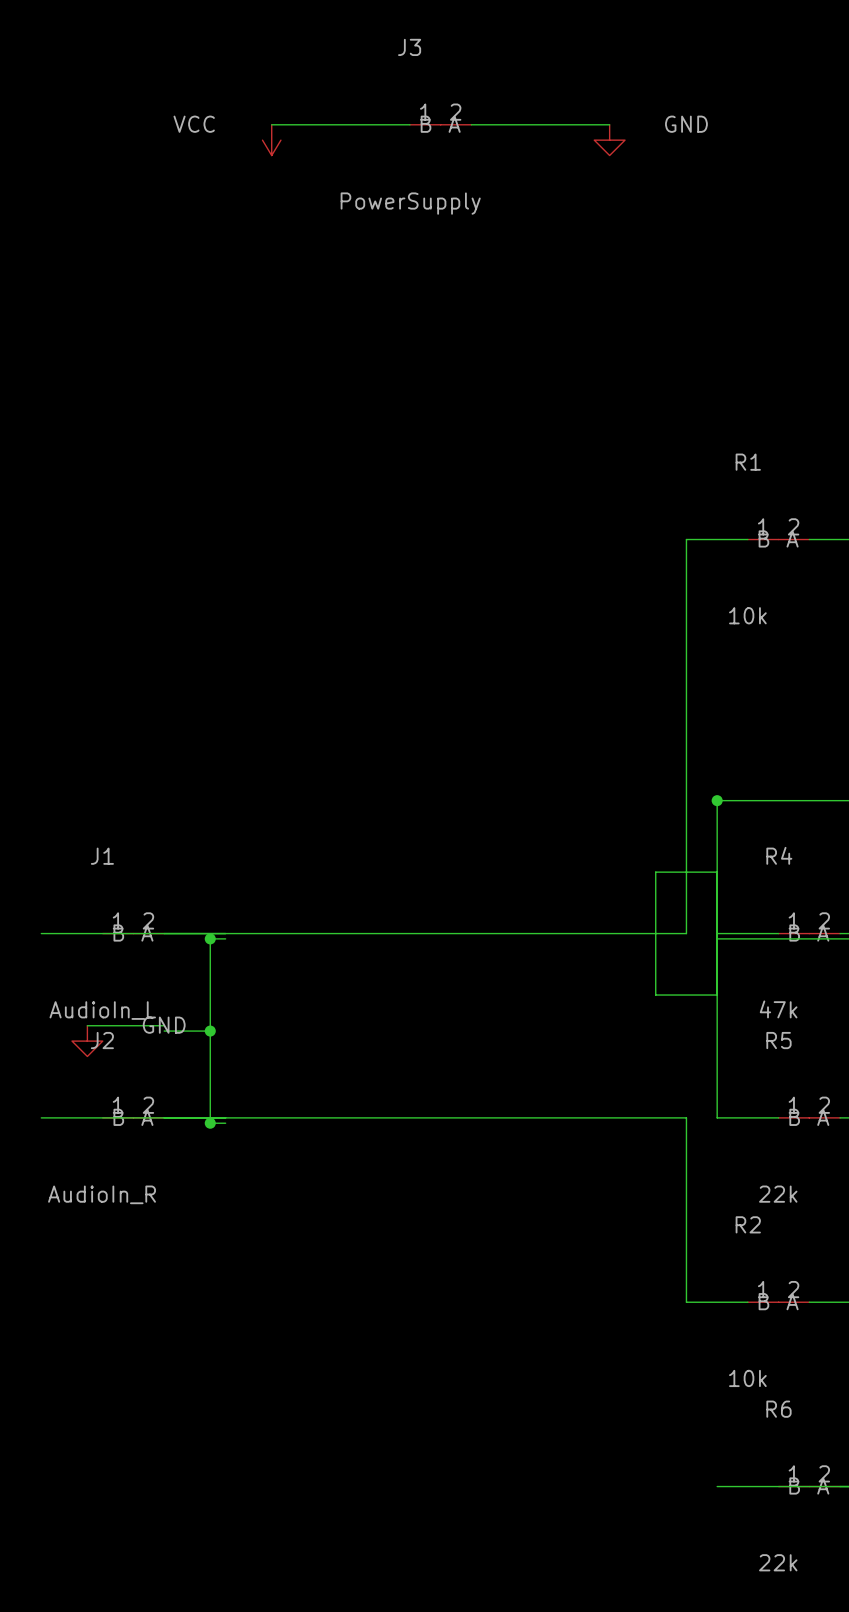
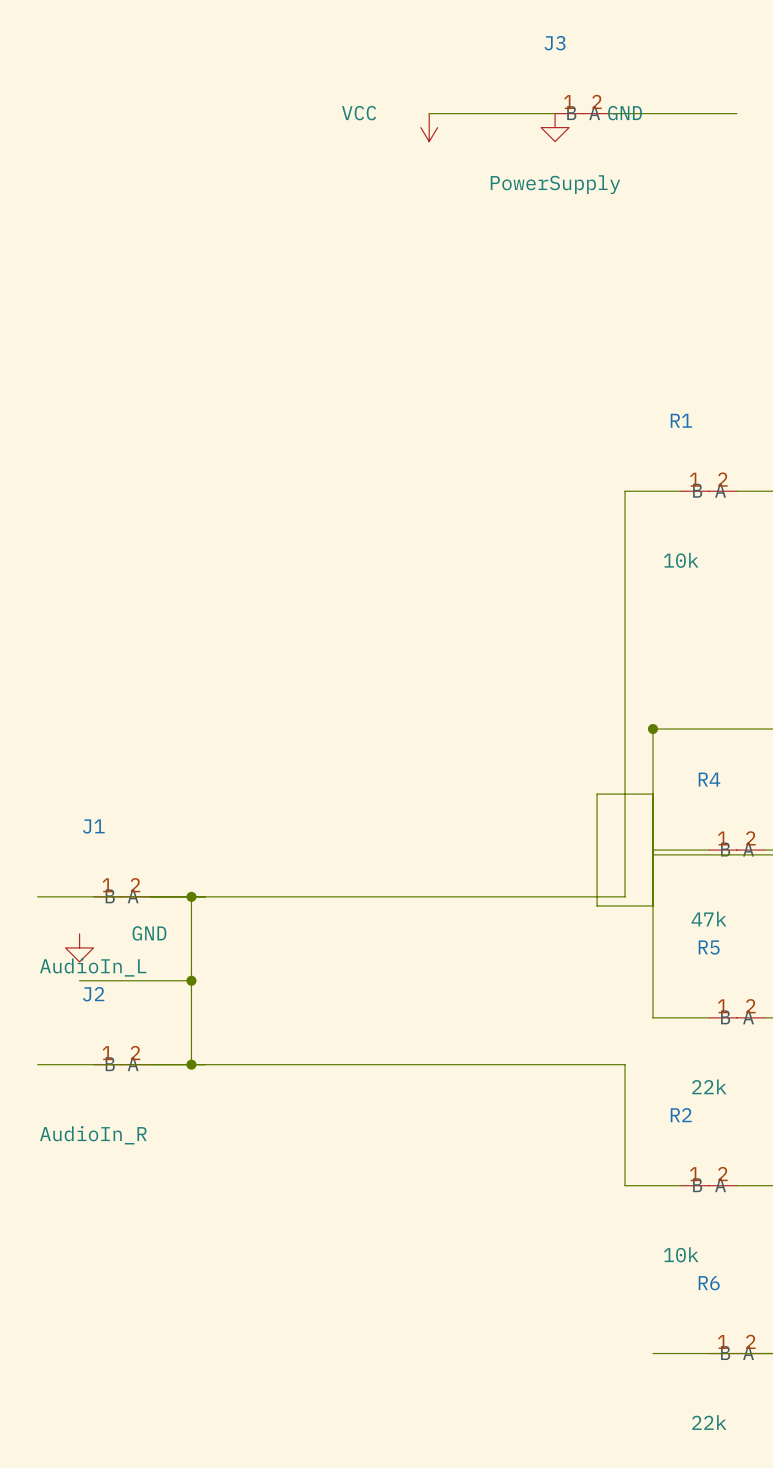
wire: (271, 124) (409, 124) -> none
J3 position: (440, 124) -> (583, 113)
wire: none -> (611, 113) (736, 113)
power symbol position: VCC (271, 140) -> VCC (429, 127)
wire: (41, 933) (686, 933) -> (37, 896) (625, 896) (625, 850)
J1 position: (133, 933) -> (121, 896)
junction: (210, 938) -> none
wire: (225, 938) (210, 938) (210, 984) -> none
junction: none -> (191, 896)
wire: (87, 1025) (164, 1025) -> none
wire: (164, 1031) (210, 1031) -> none
junction: (210, 1031) -> none
wire: none -> (79, 980) (191, 980)
junction: none -> (191, 980)
wire: (41, 1117) (686, 1117) (686, 1169) -> (37, 1064) (625, 1064)
J2 position: (133, 1117) -> (121, 1064)
wire: (210, 1123) (225, 1123) -> (191, 1022) (191, 1064)
junction: (210, 1123) -> none
junction: none -> (191, 1064)

